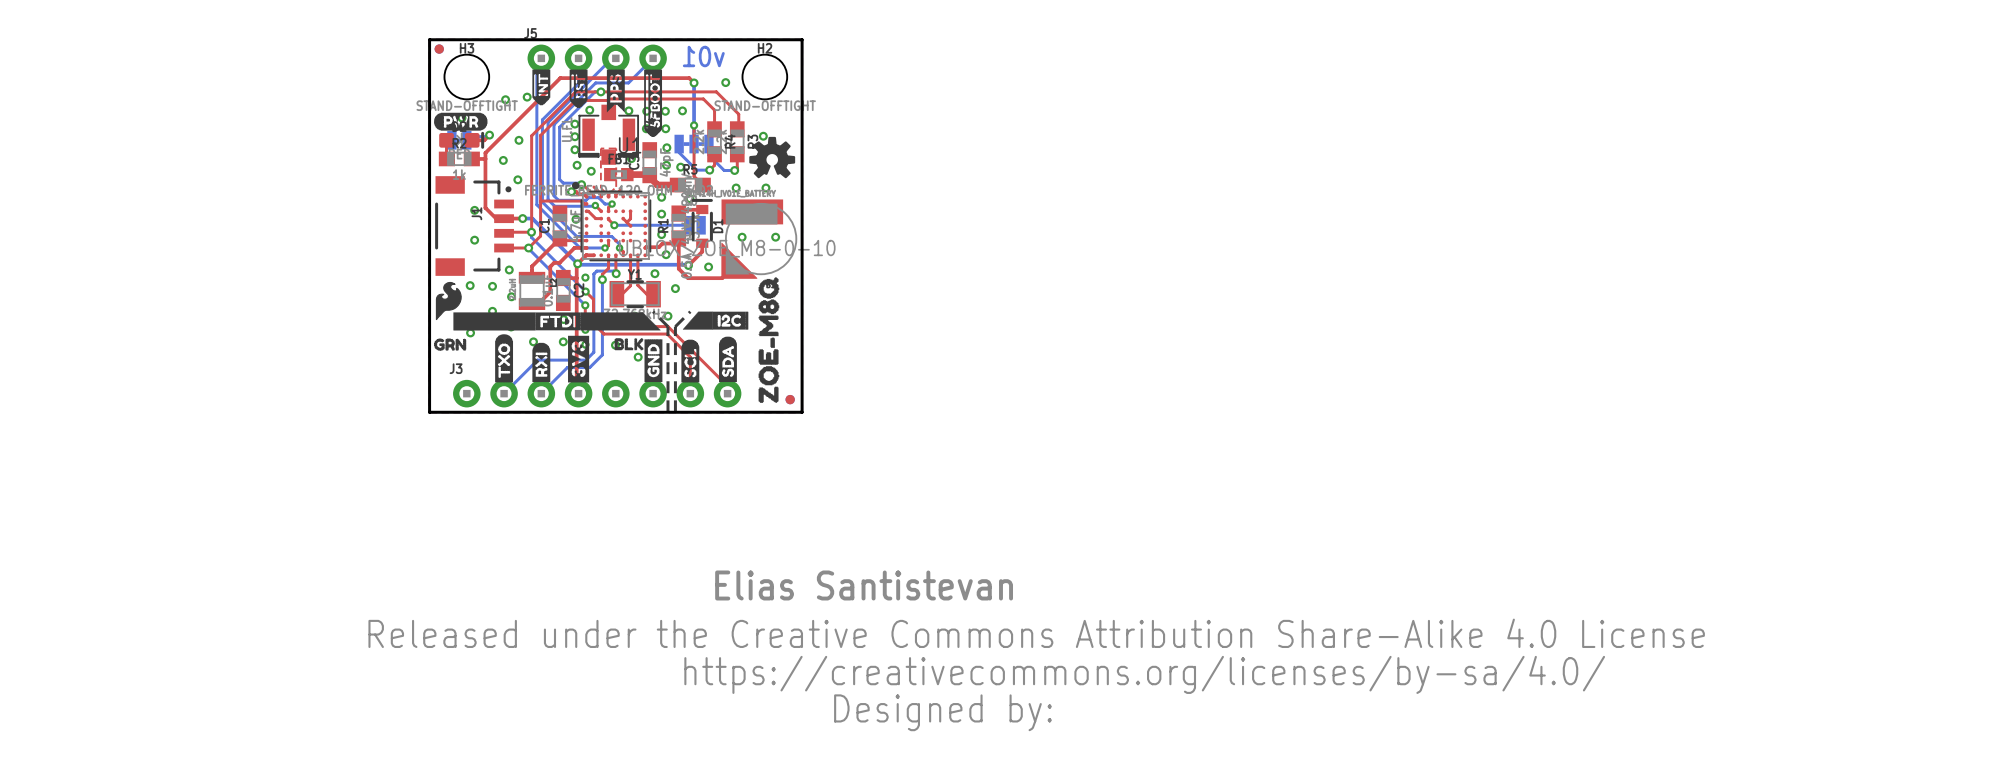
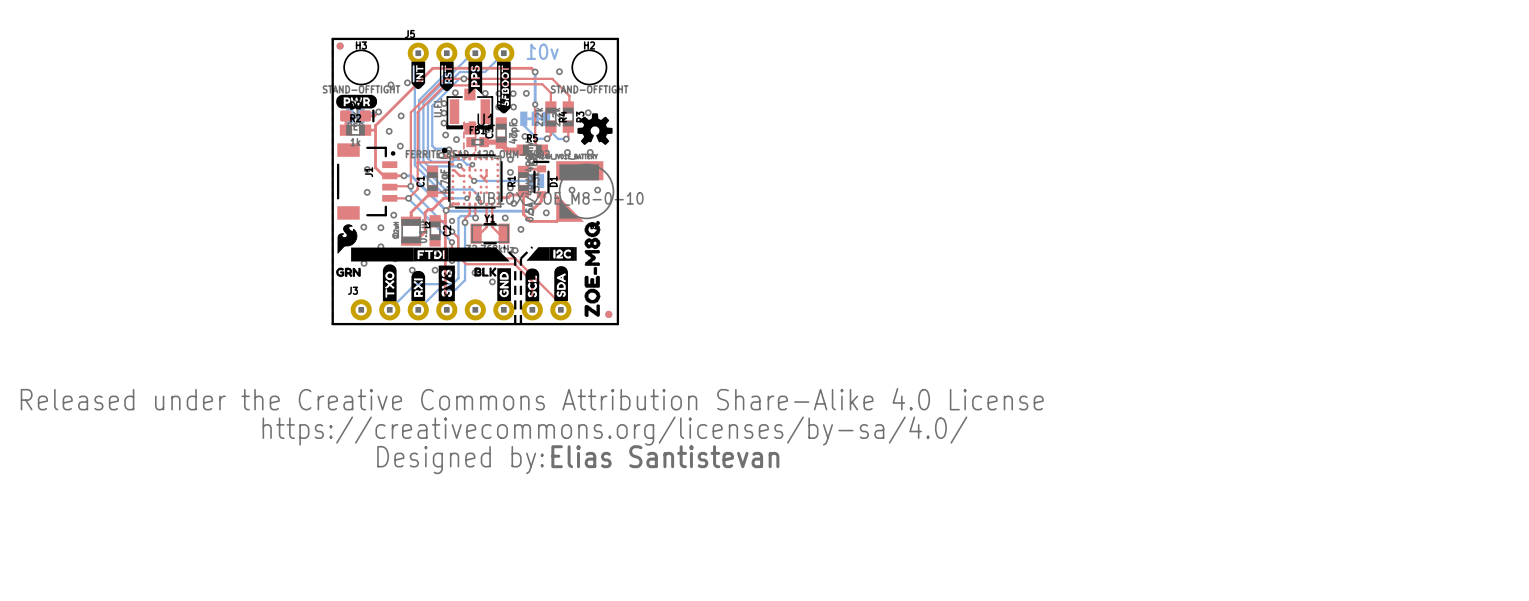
drawing: none -> [20, 387, 1044, 475]
drawing: [368, 618, 1705, 732] -> none

